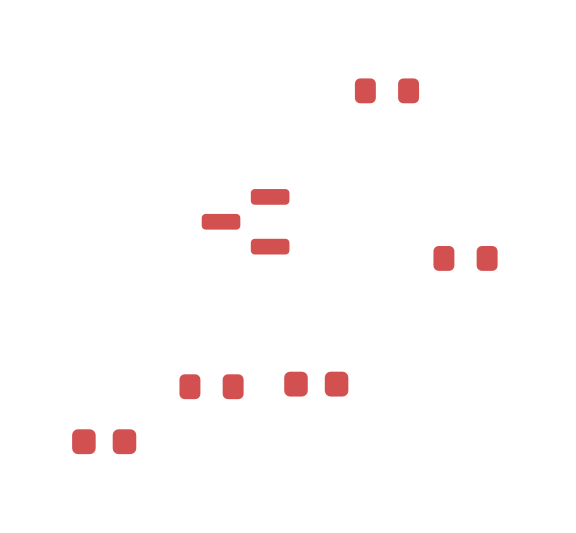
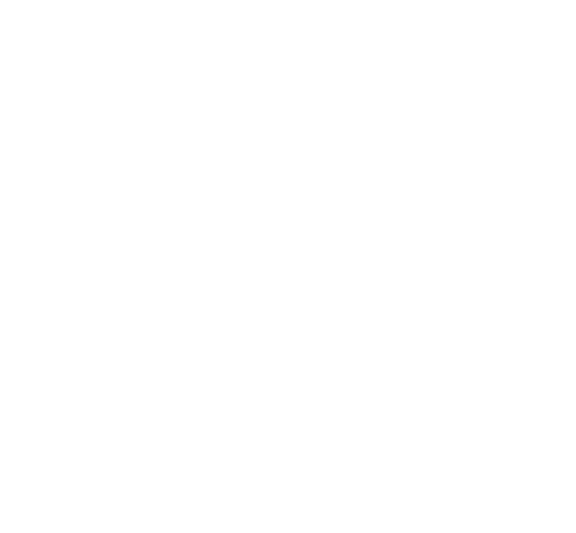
part: (386, 90) -> none
part: (245, 221) -> none
part: (465, 258) -> none
part: (316, 384) -> none
part: (211, 386) -> none
part: (104, 441) -> none

